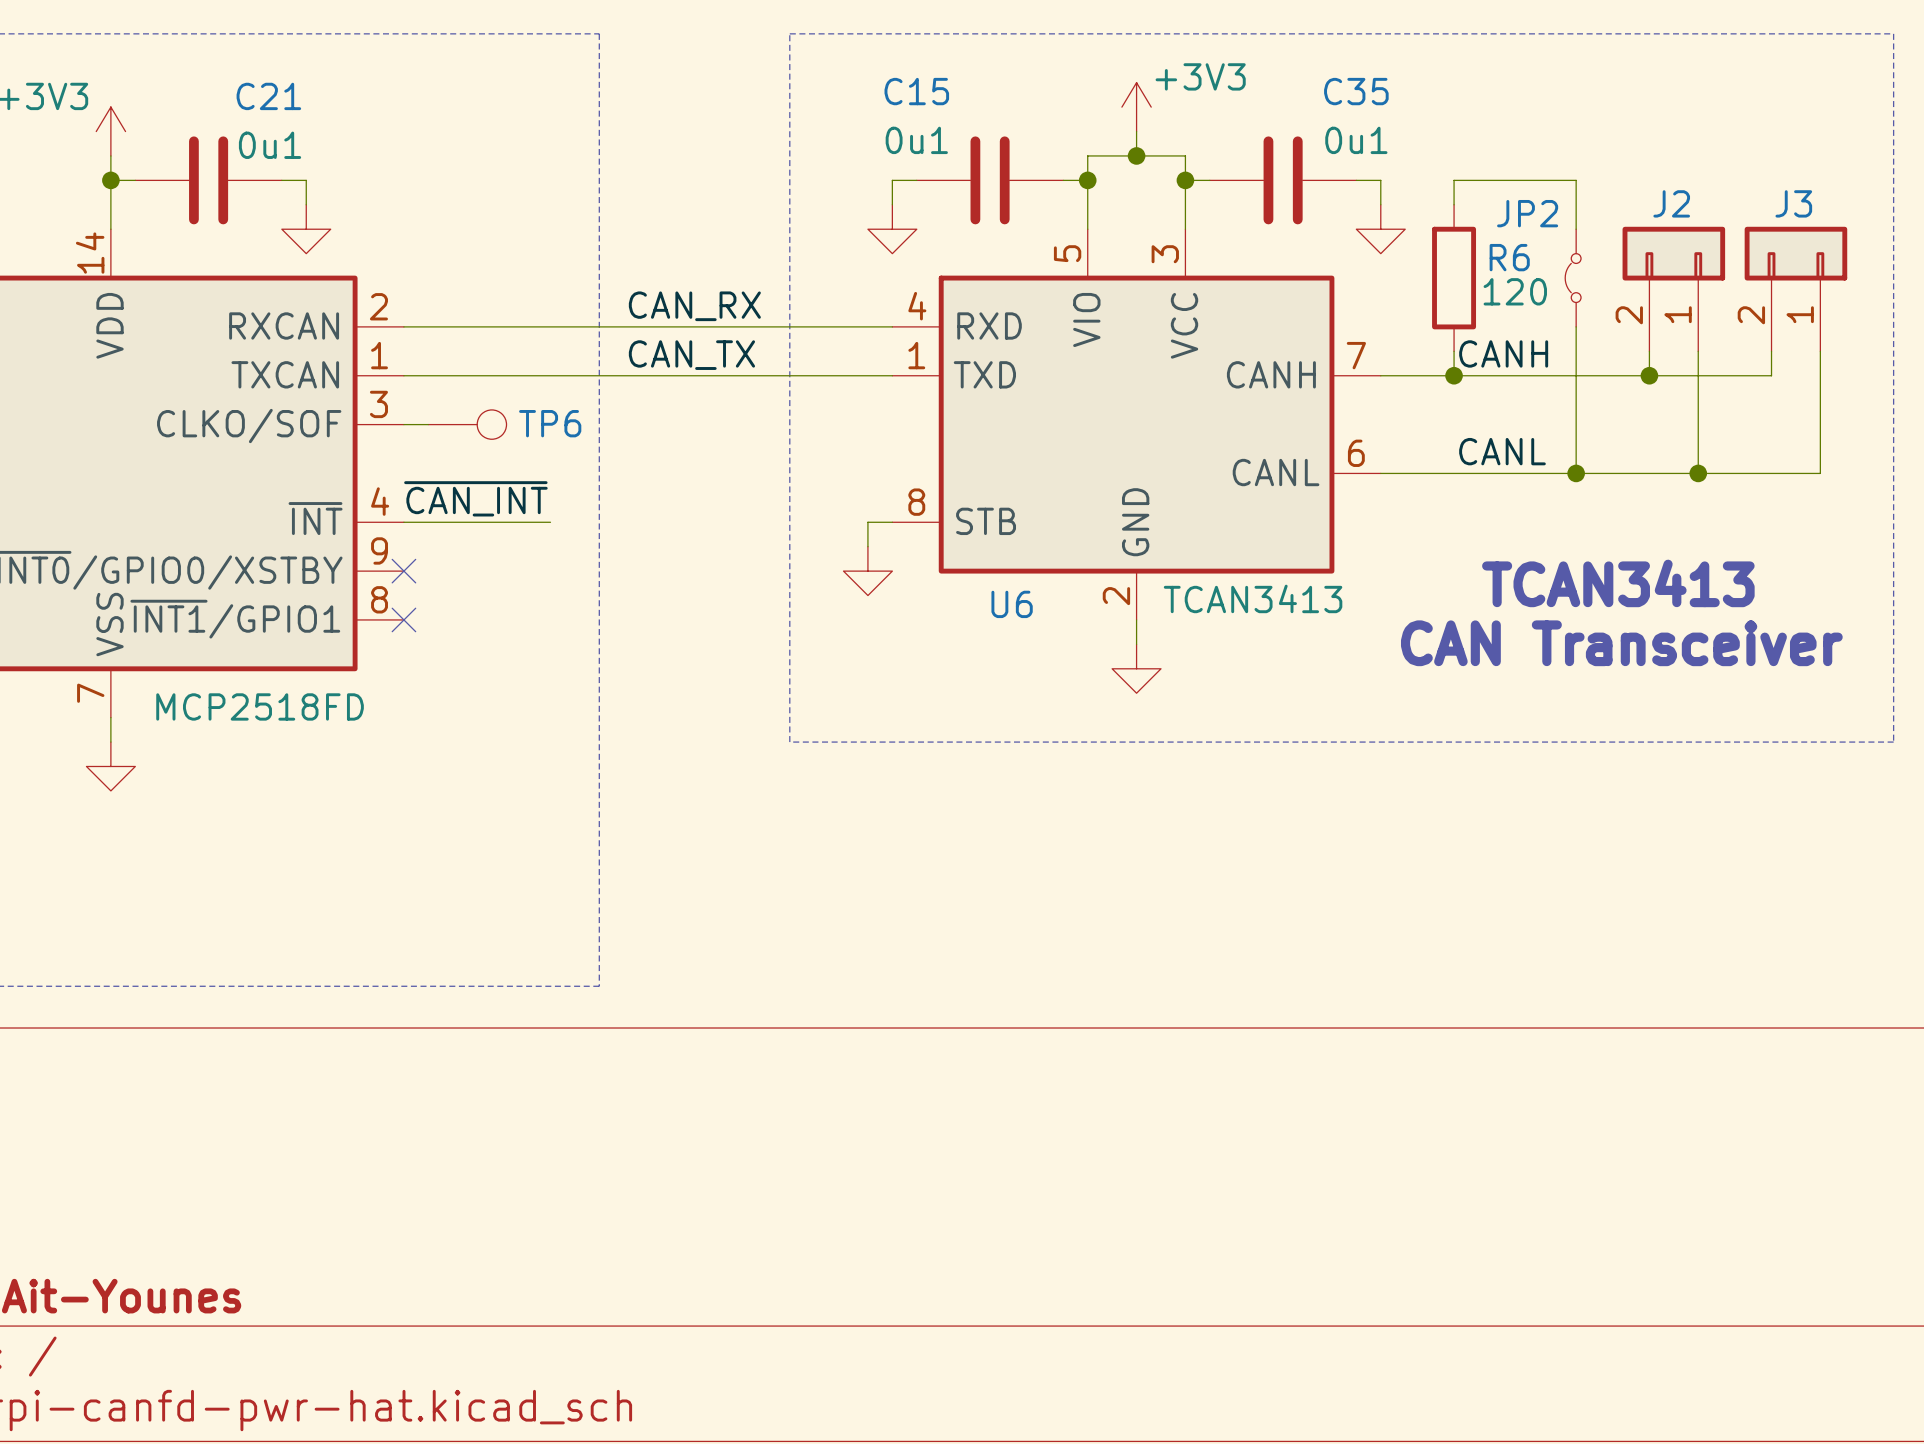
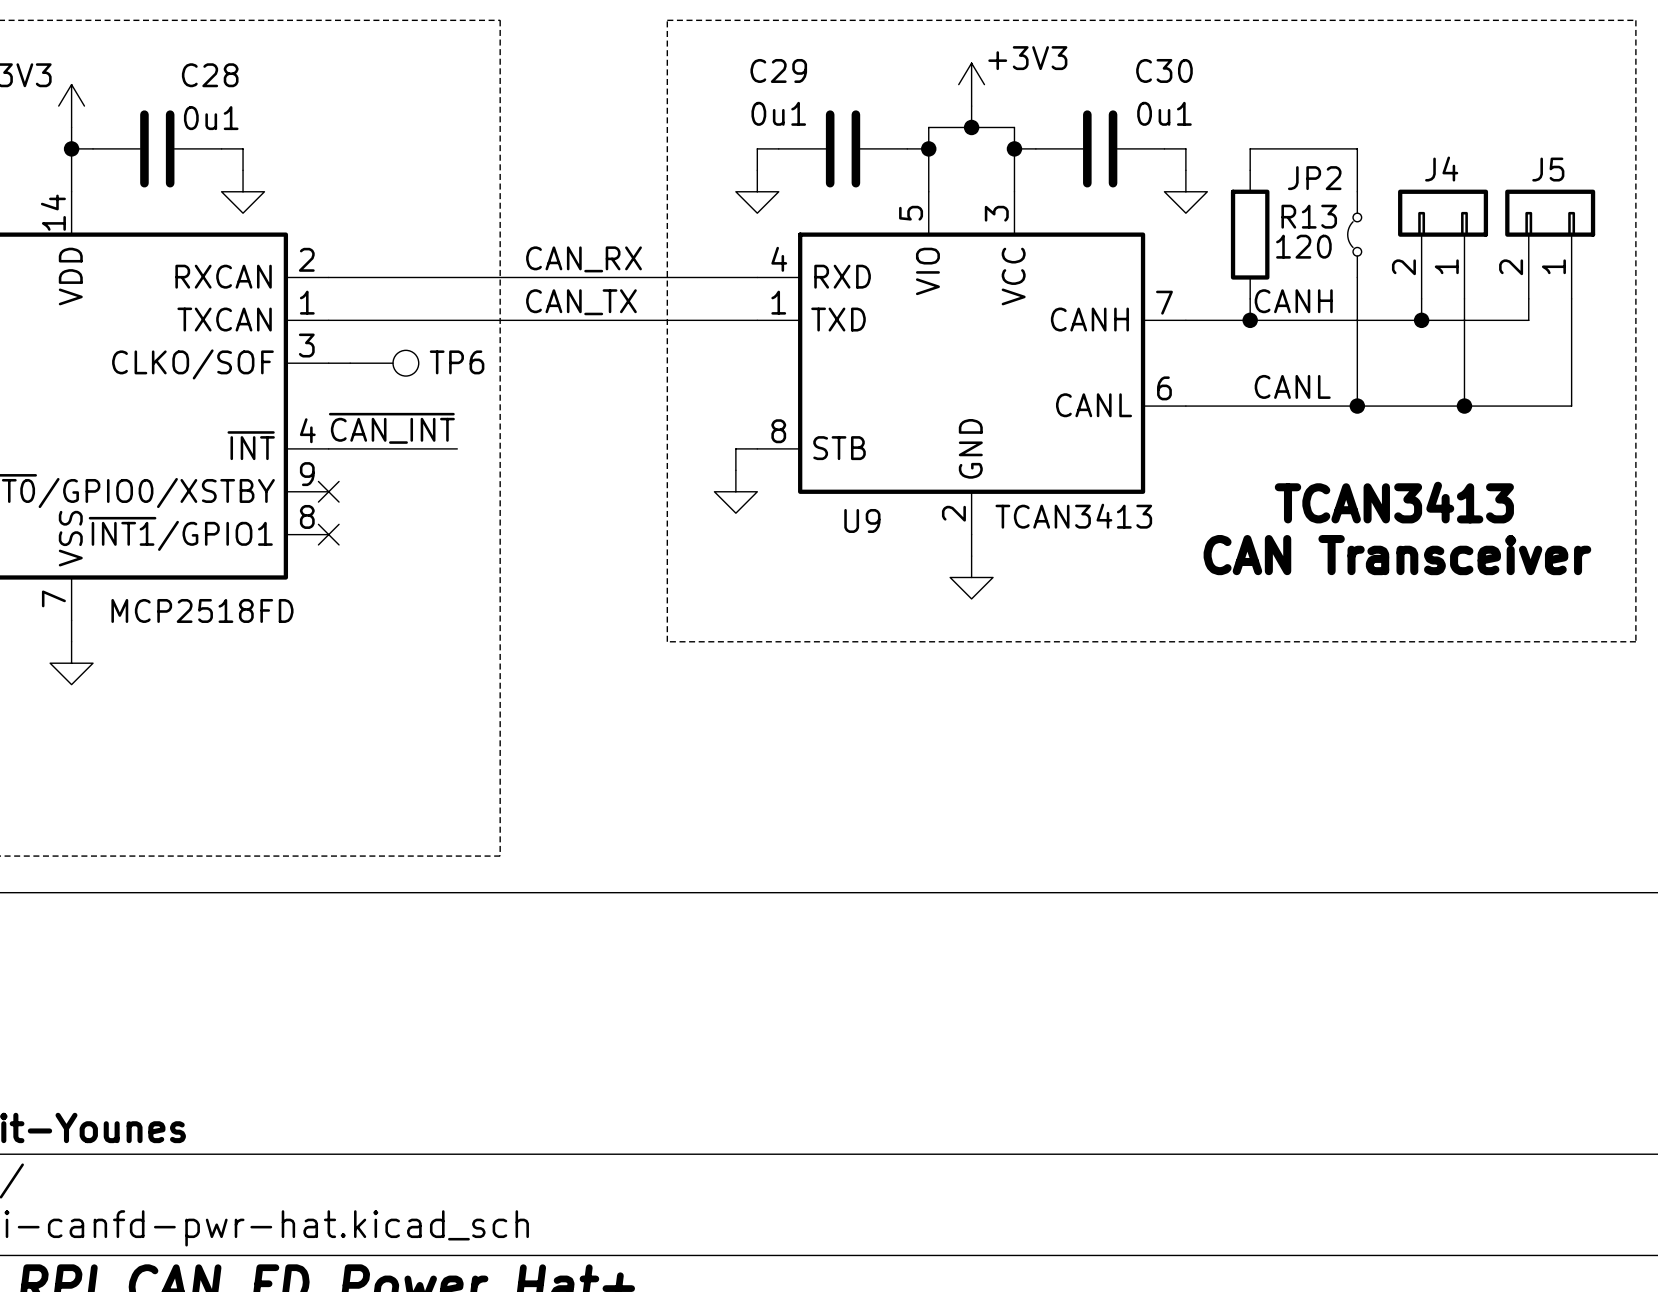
C15 name: C15 (916, 91) -> C29 (778, 70)
C35 name: C35 (1356, 91) -> C30 (1164, 70)
C21 name: C21 (268, 96) -> C28 (210, 75)
J2 name: J2 (1671, 203) -> J4 (1441, 169)
J3 name: J3 (1793, 203) -> J5 (1548, 169)
R6 name: R6 (1509, 257) -> R13 (1309, 216)
U6 name: U6 (1012, 604) -> U9 (862, 520)

